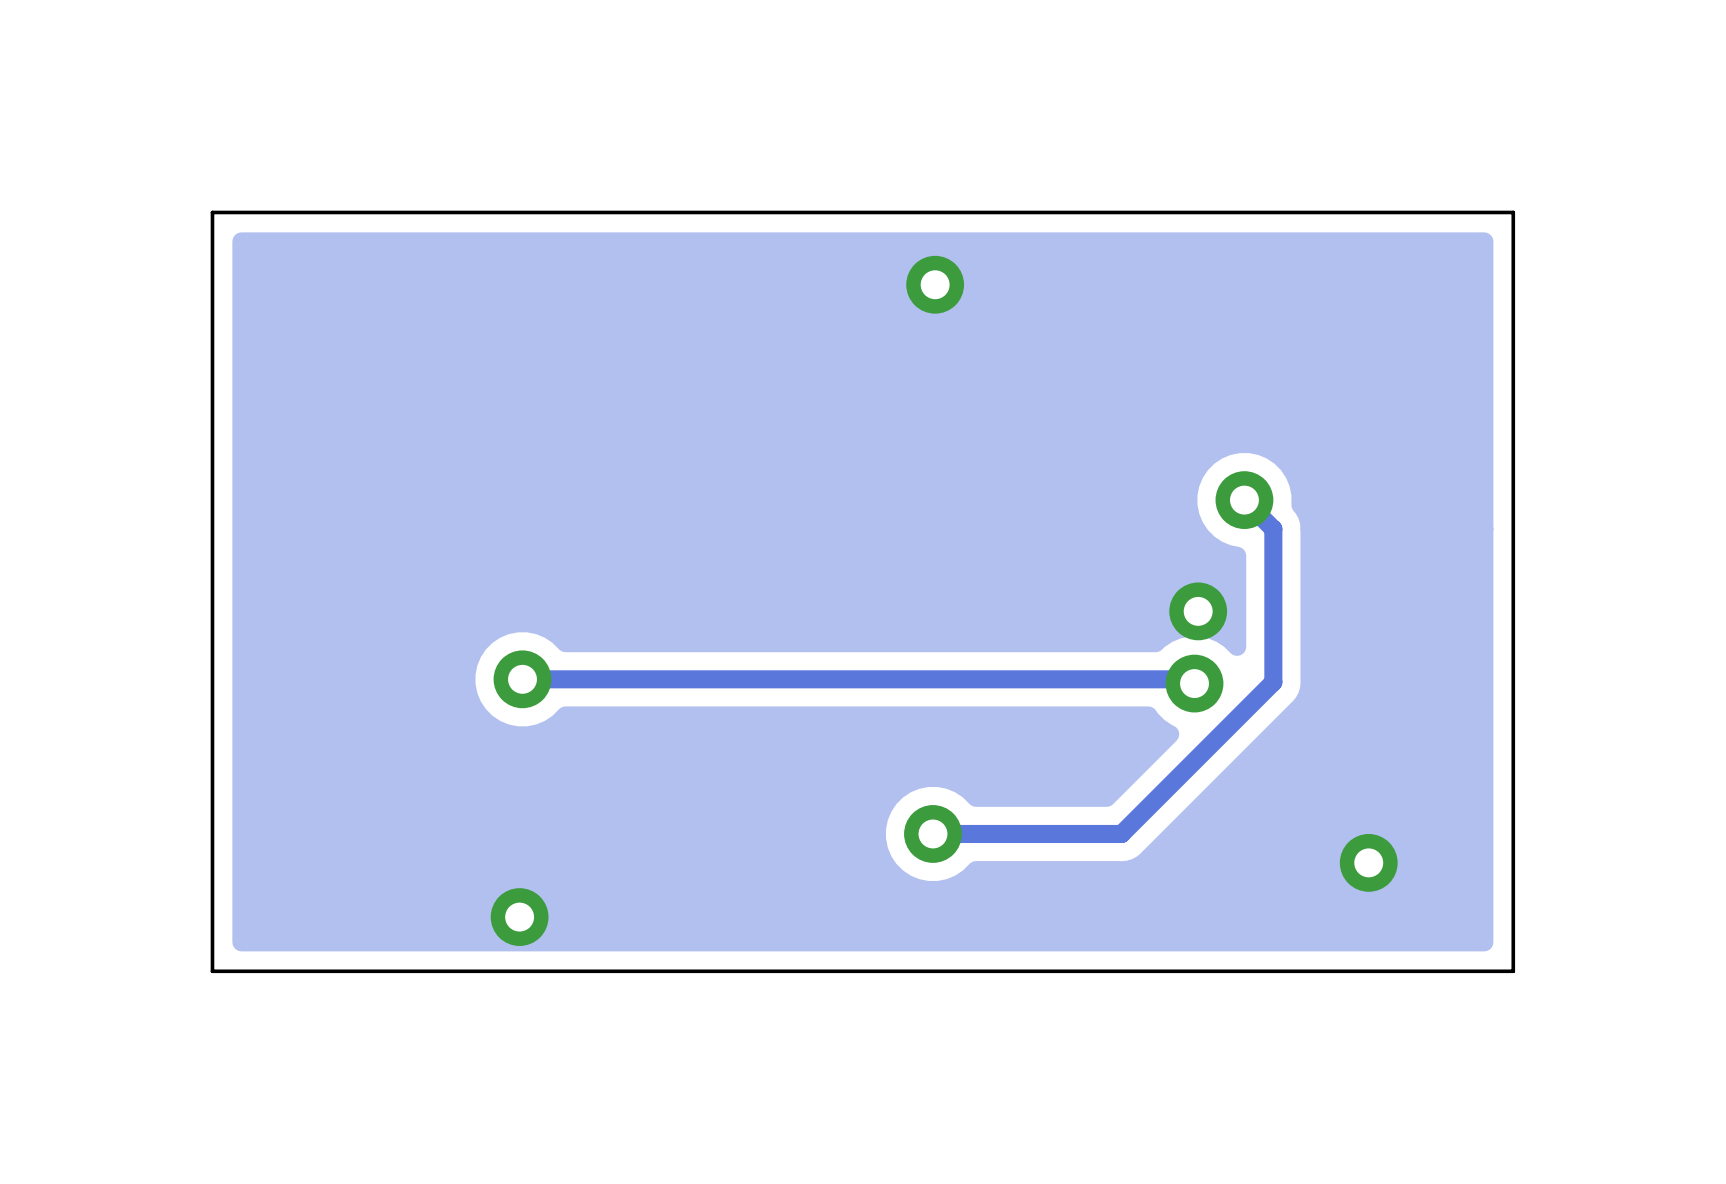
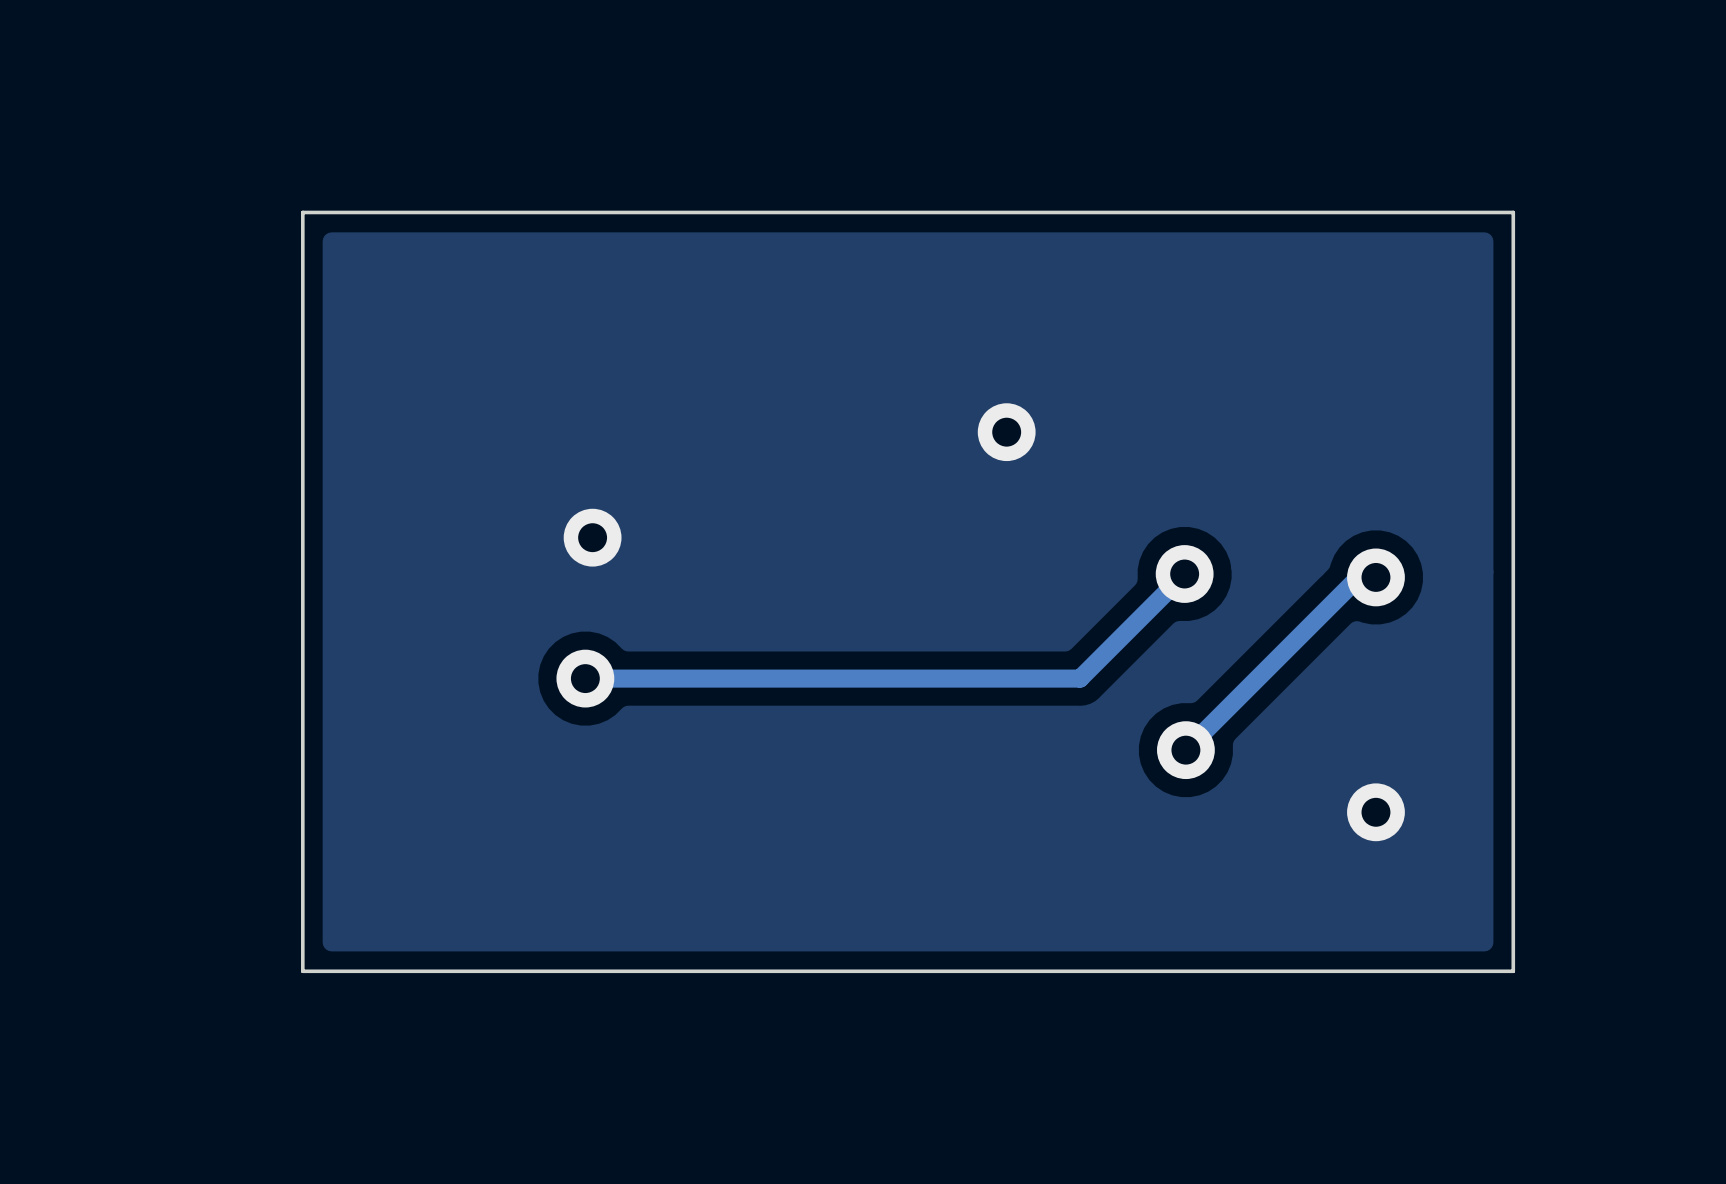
board edge: (302, 212) (212, 212) (212, 971) (302, 971) -> (302, 212) (302, 971)
via: (935, 284) -> none
via: none -> (1006, 432)
track: (1244, 500) (1273, 529) (1273, 682) (1121, 833) (932, 833) -> none
via: (1244, 500) -> none
via: none -> (592, 537)
track: none -> (1184, 574) (1080, 678) (585, 678)
track: none -> (1375, 577) (1358, 577) (1185, 750)
via: none -> (1375, 577)
via position: (1198, 611) -> (1184, 574)
track: (522, 679) (1190, 679) (1194, 683) -> none
via position: (522, 679) -> (585, 678)
via: (1194, 683) -> none
via: none -> (1185, 750)
via: (932, 833) -> none
via position: (1368, 862) -> (1375, 812)
via: (519, 917) -> none

